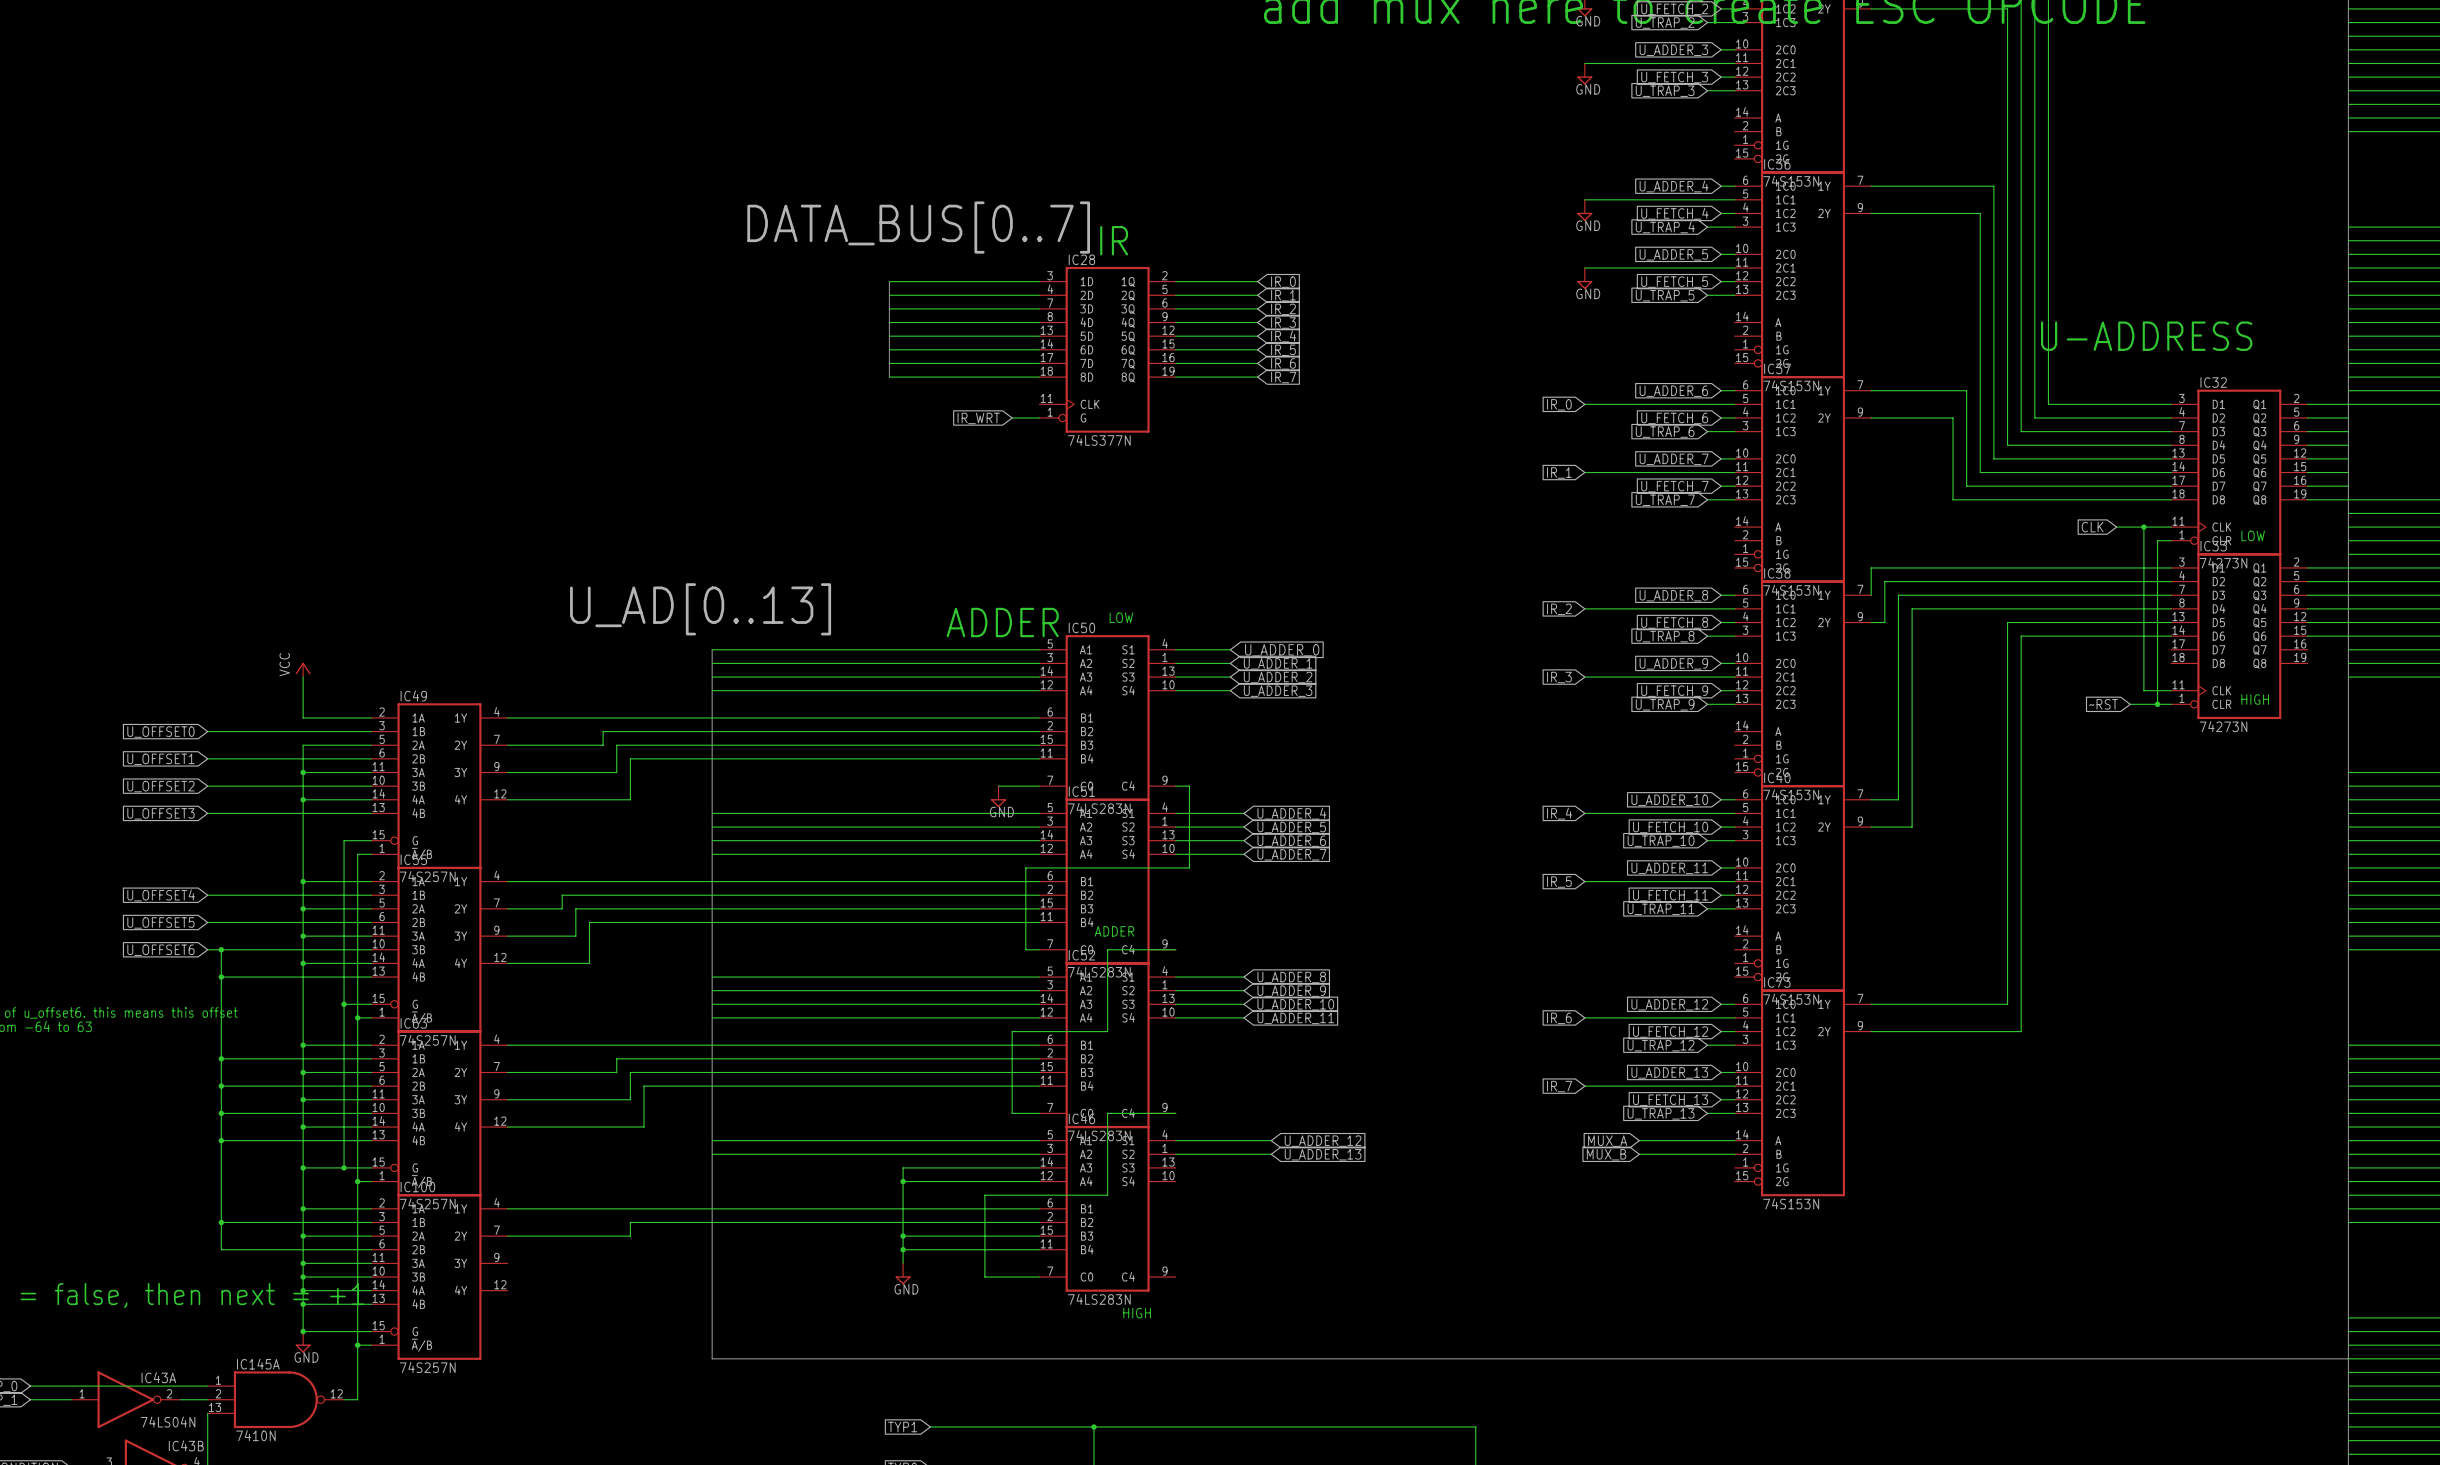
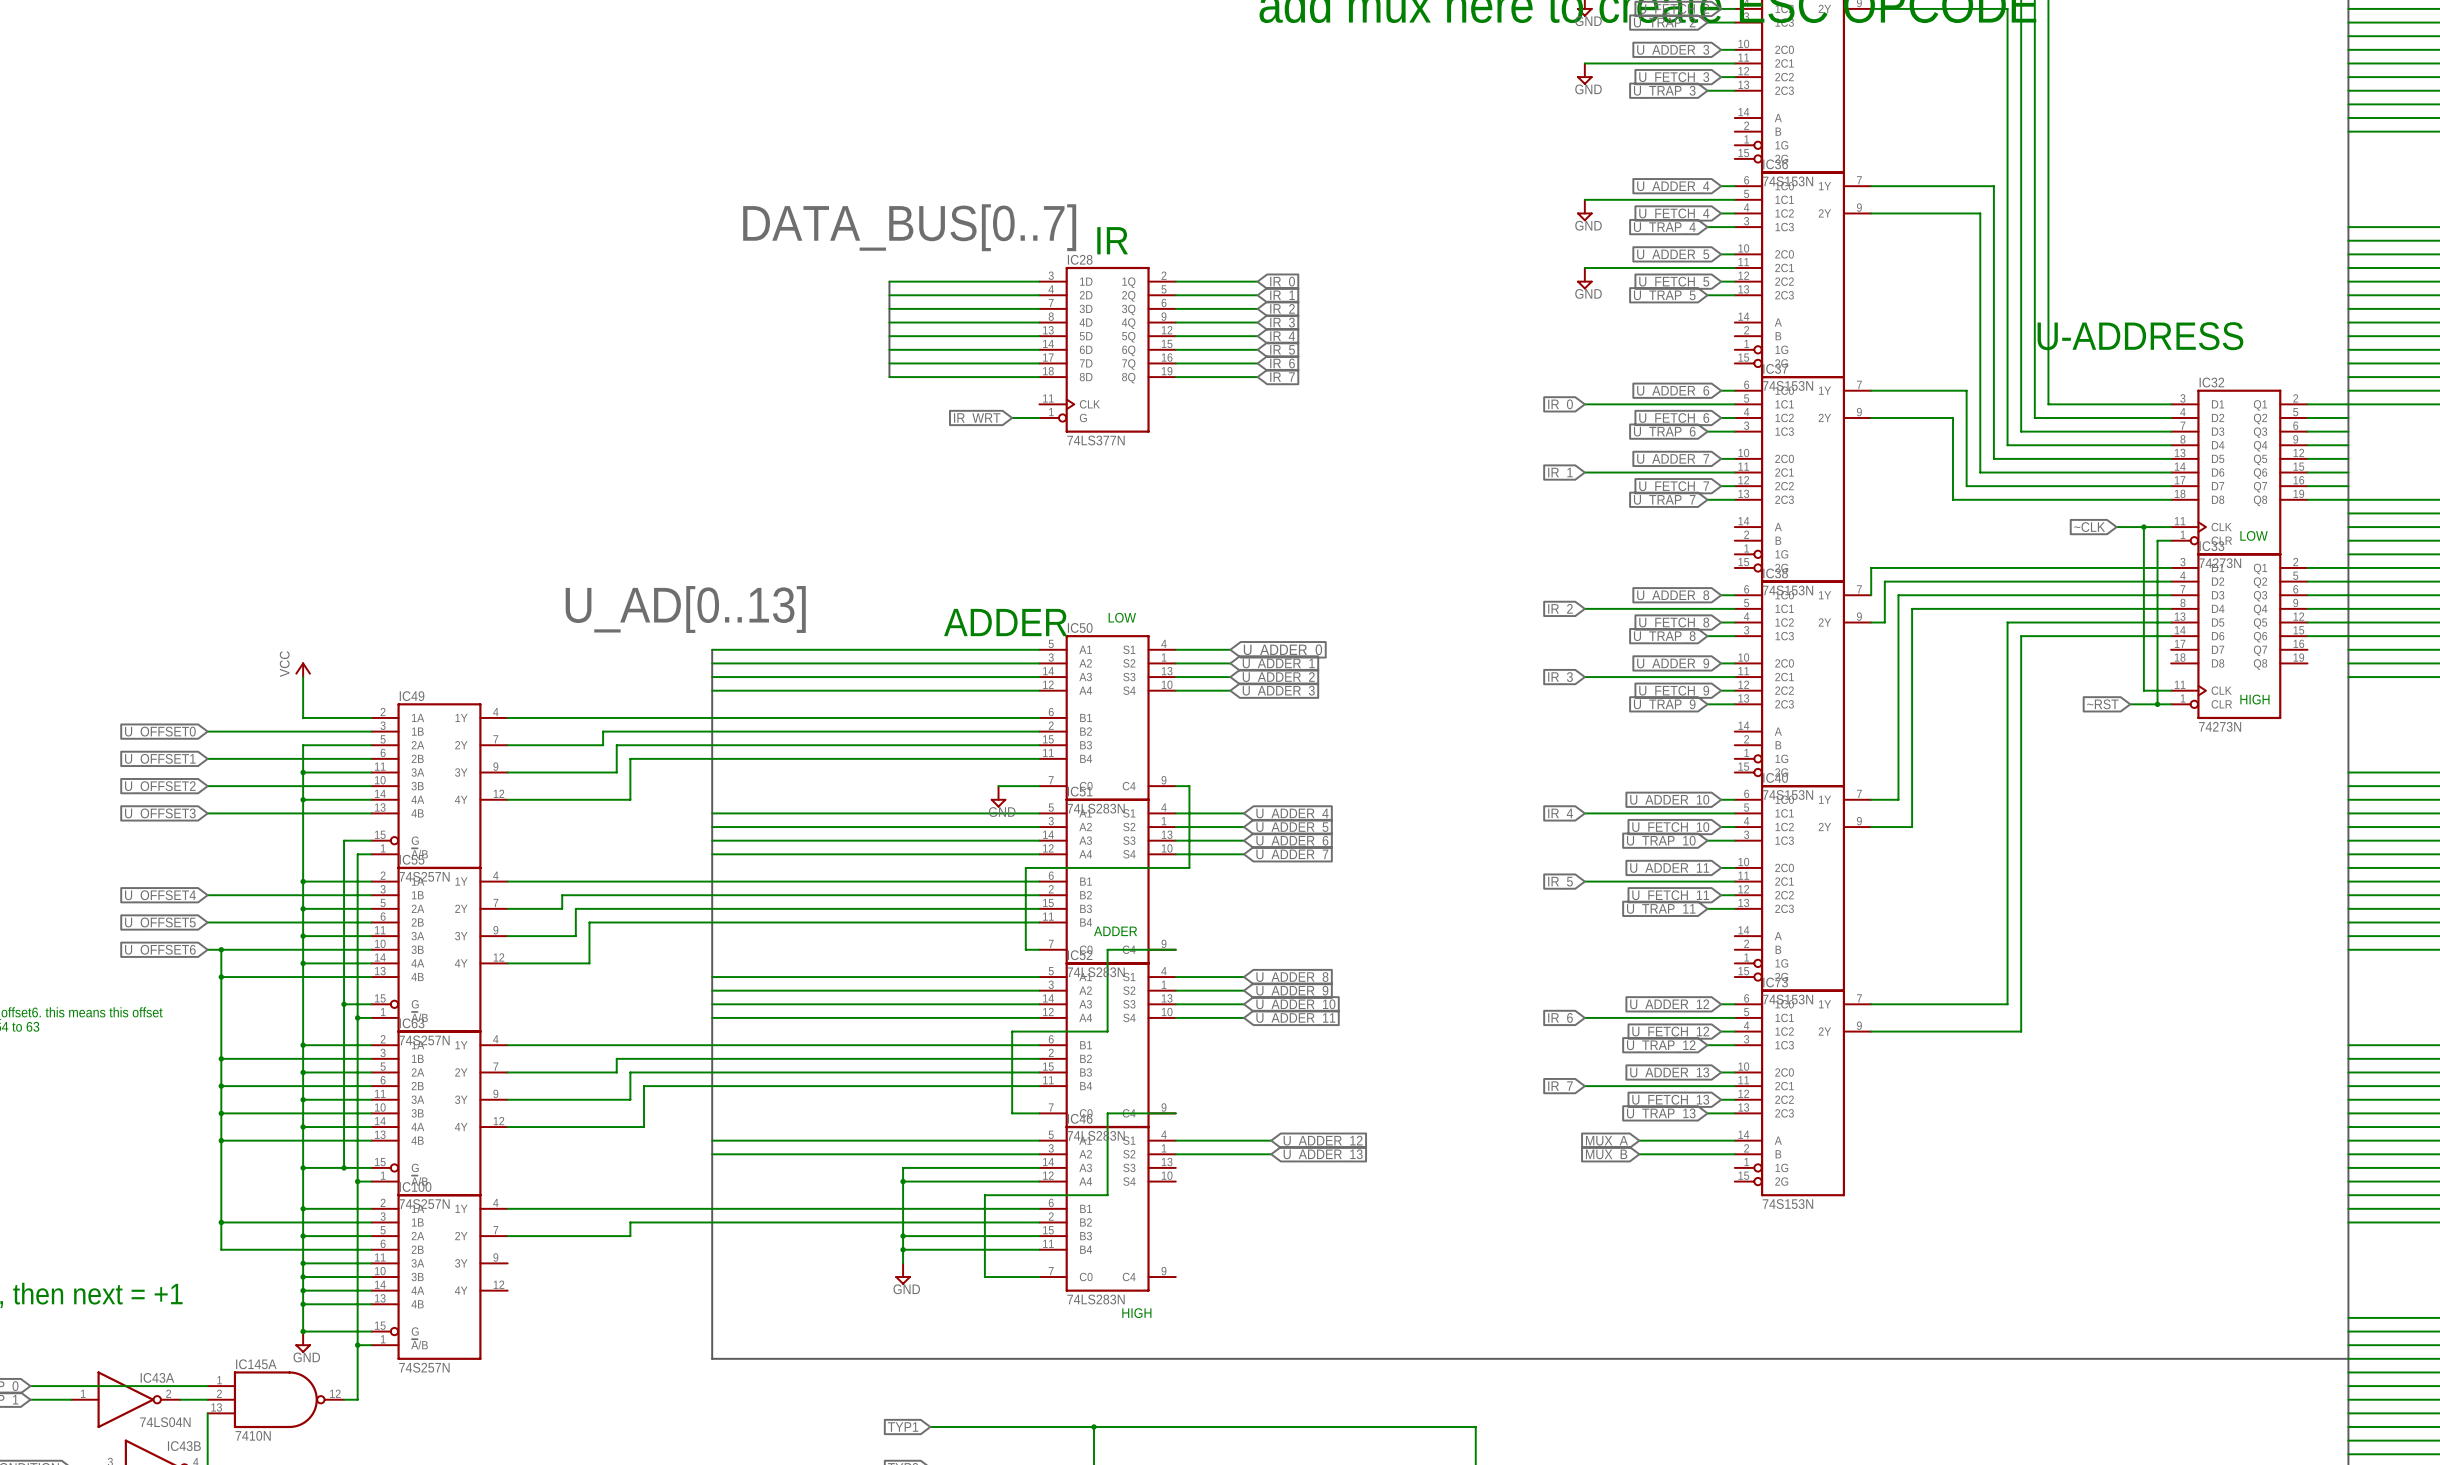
global label: CLK (2092, 527) -> ~CLK (2089, 527)

